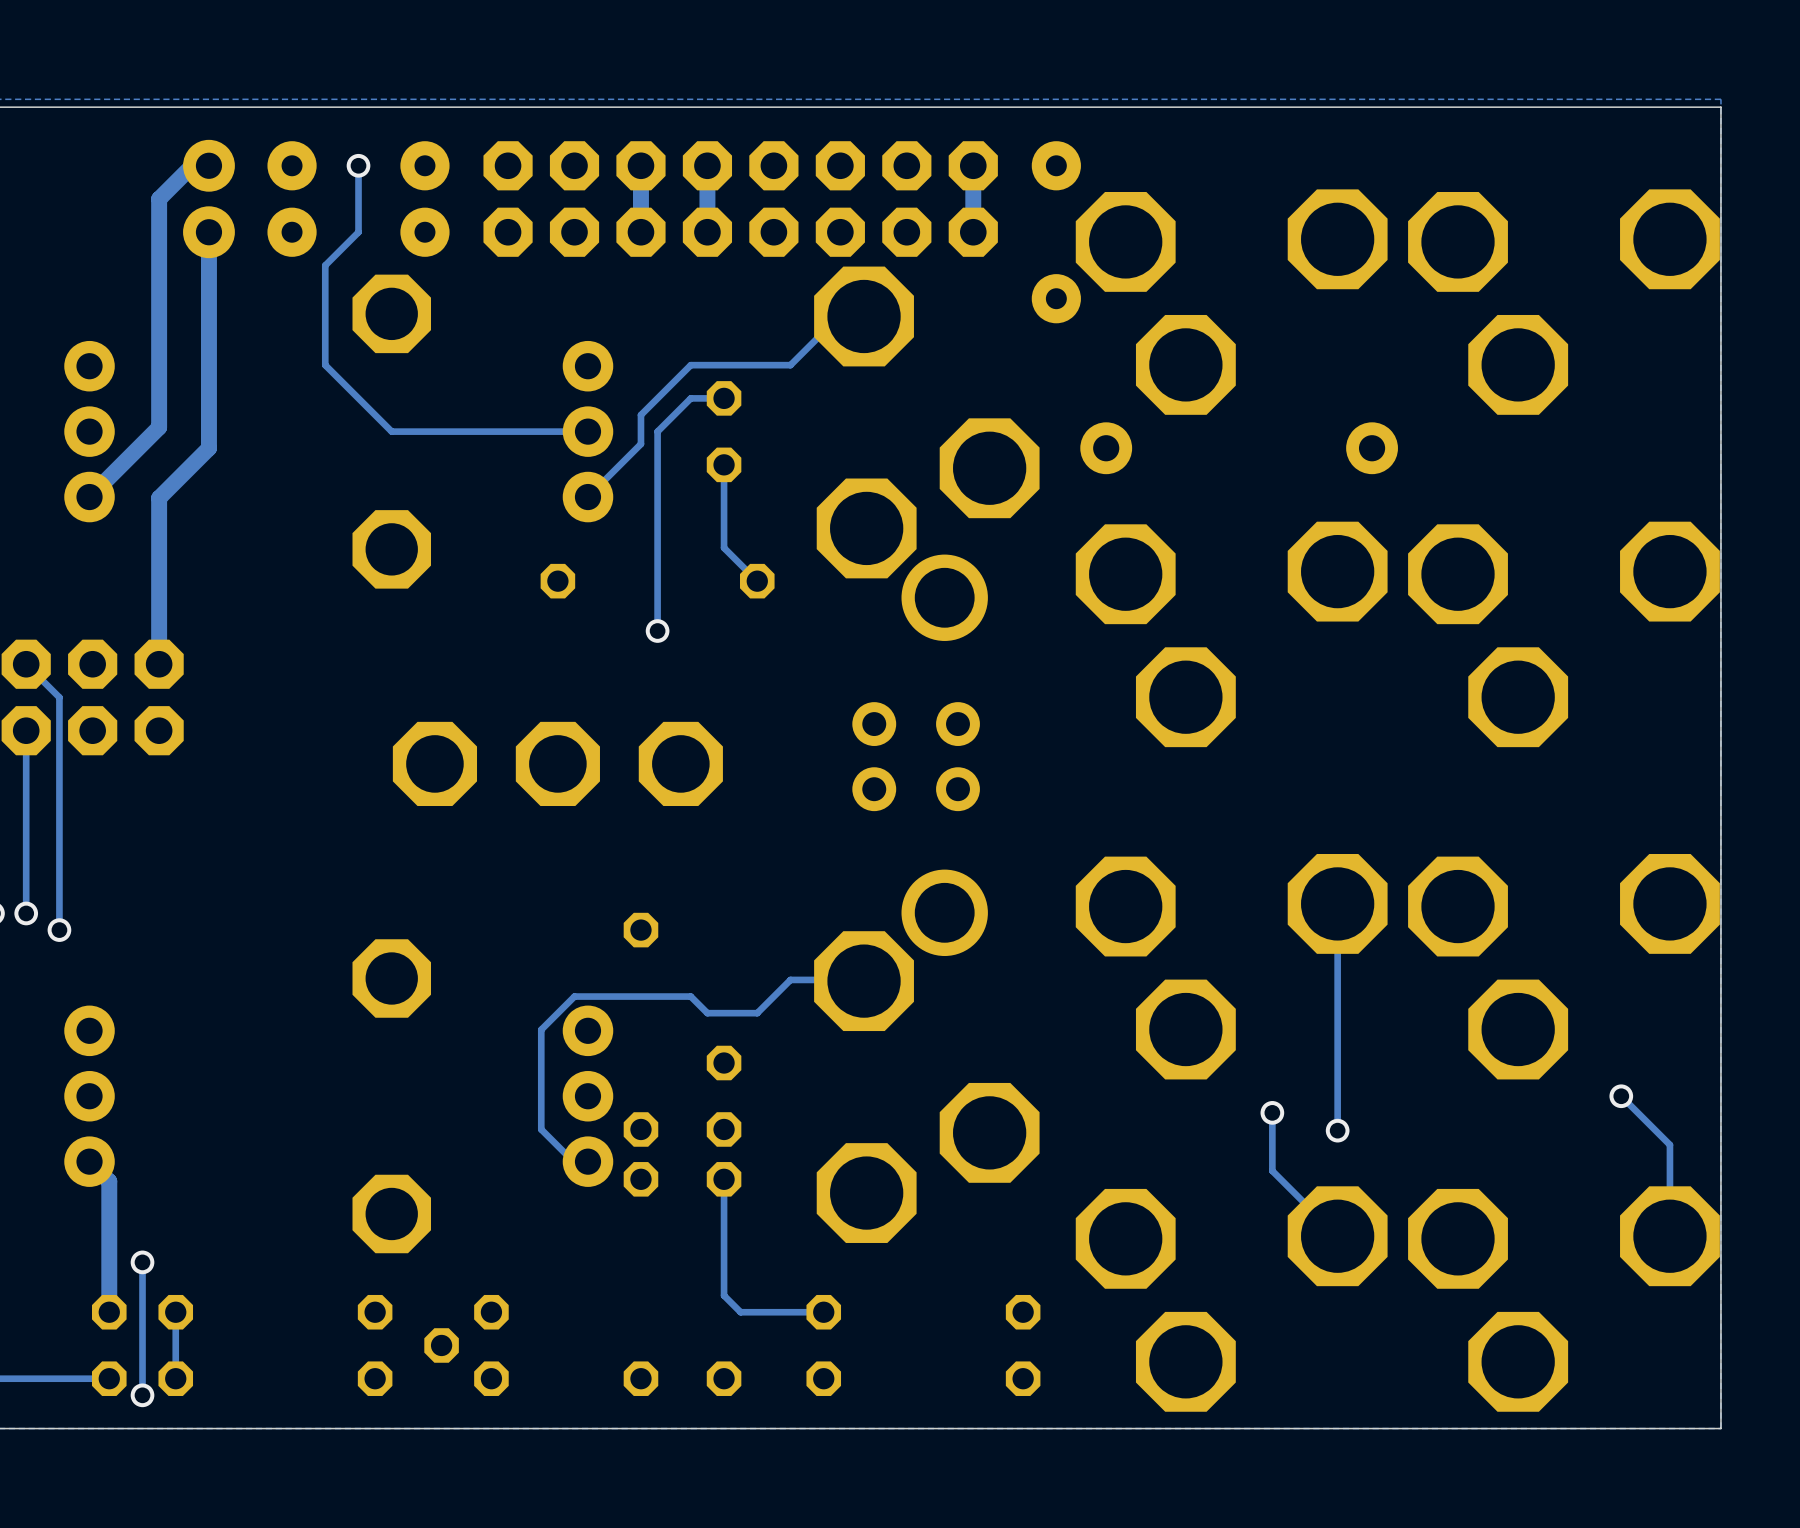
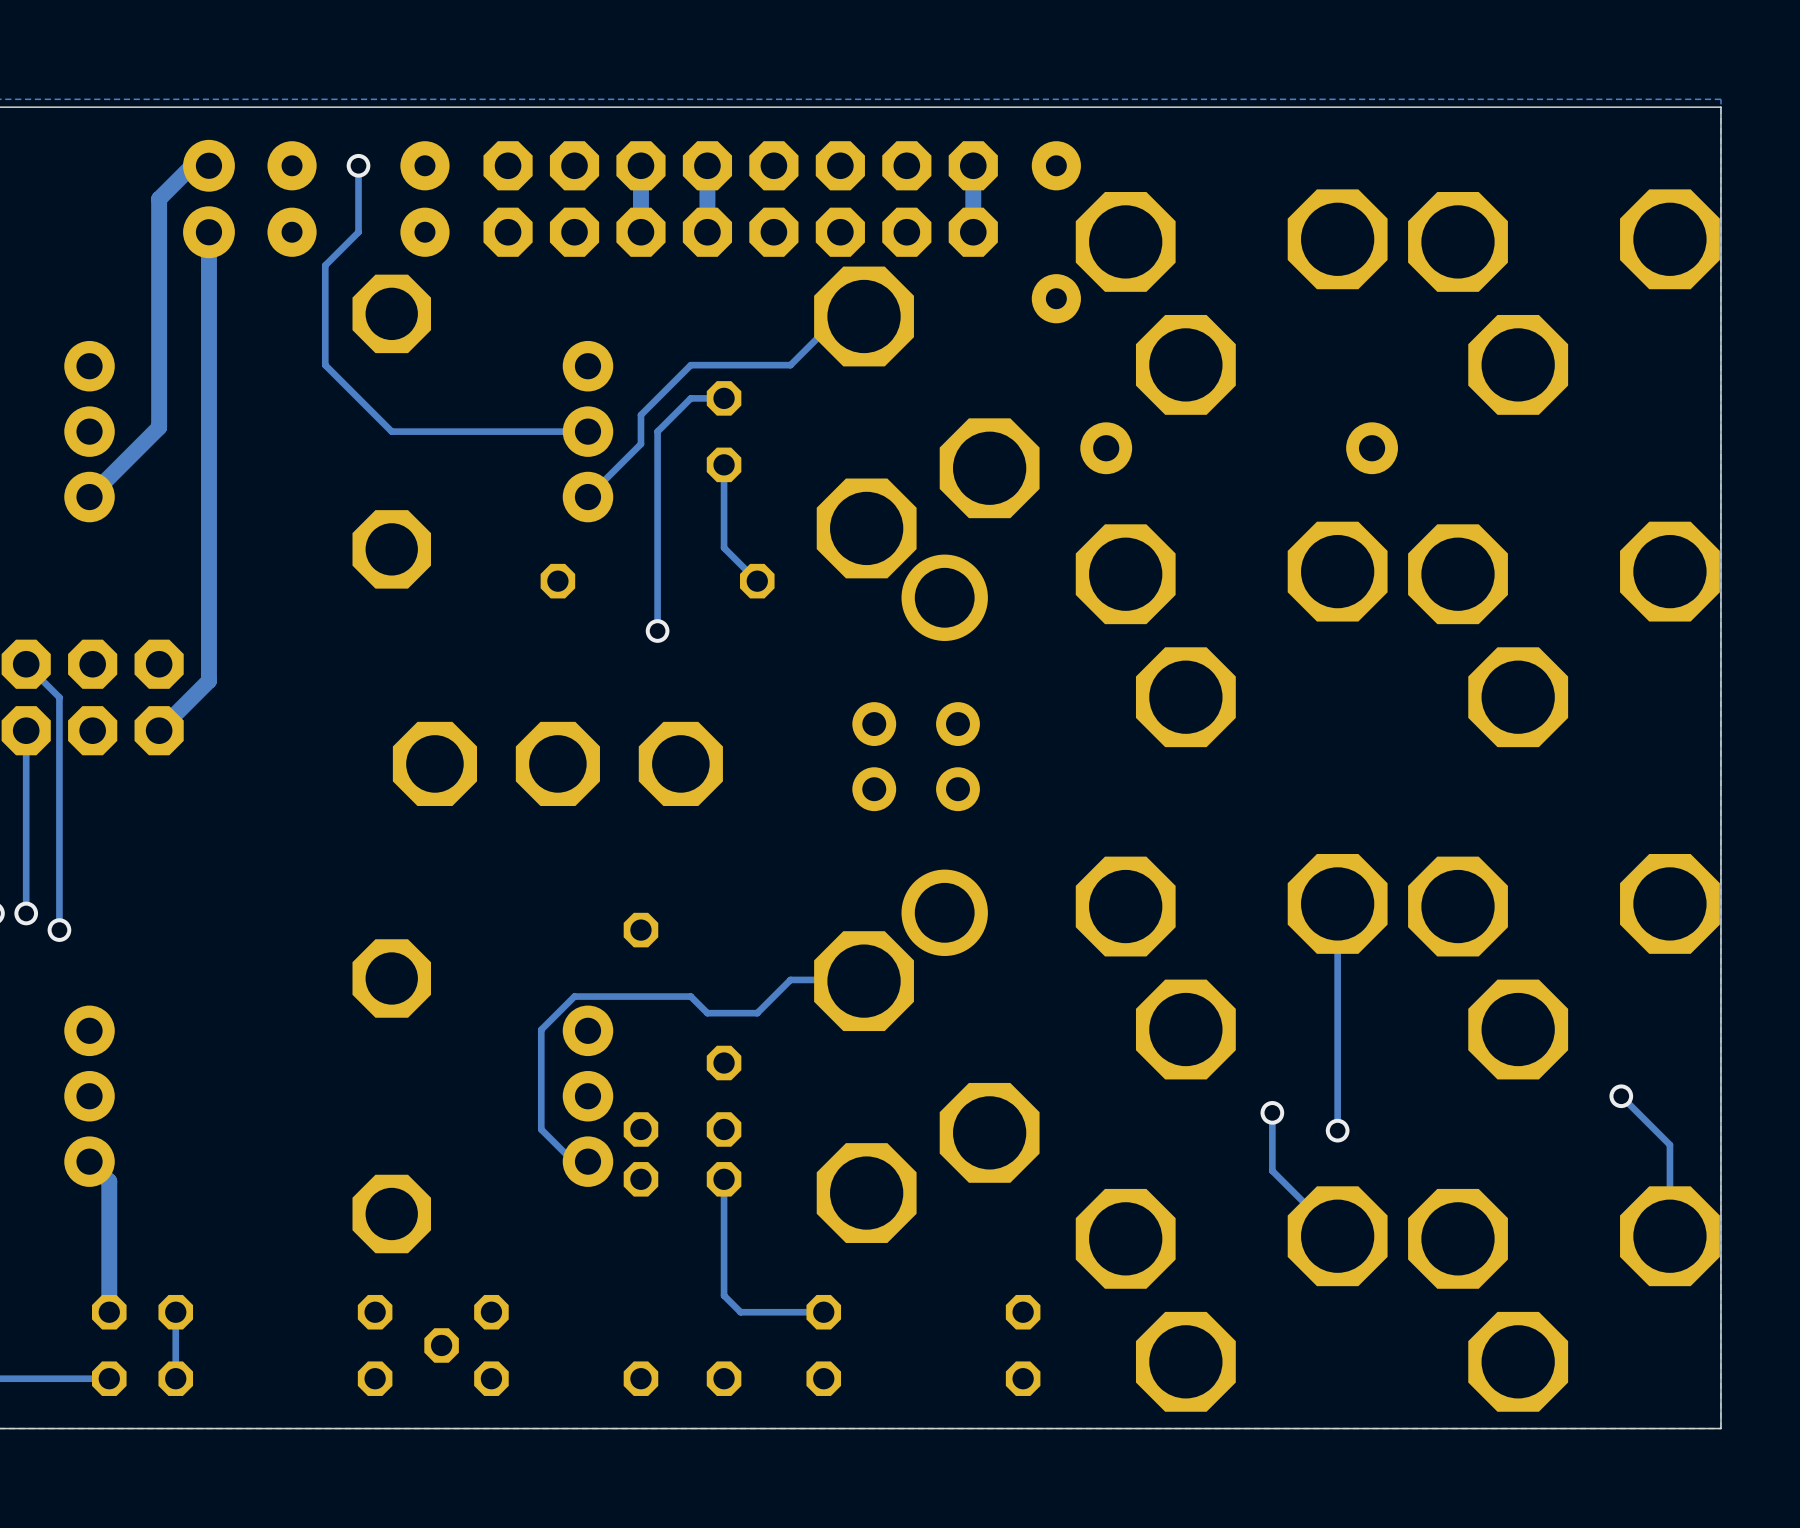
track: (208, 448) (159, 498) (159, 664) -> (208, 448) (208, 680) (159, 730)
track: (142, 1262) (142, 1395) -> none
via: (142, 1262) -> none
via: (142, 1395) -> none

